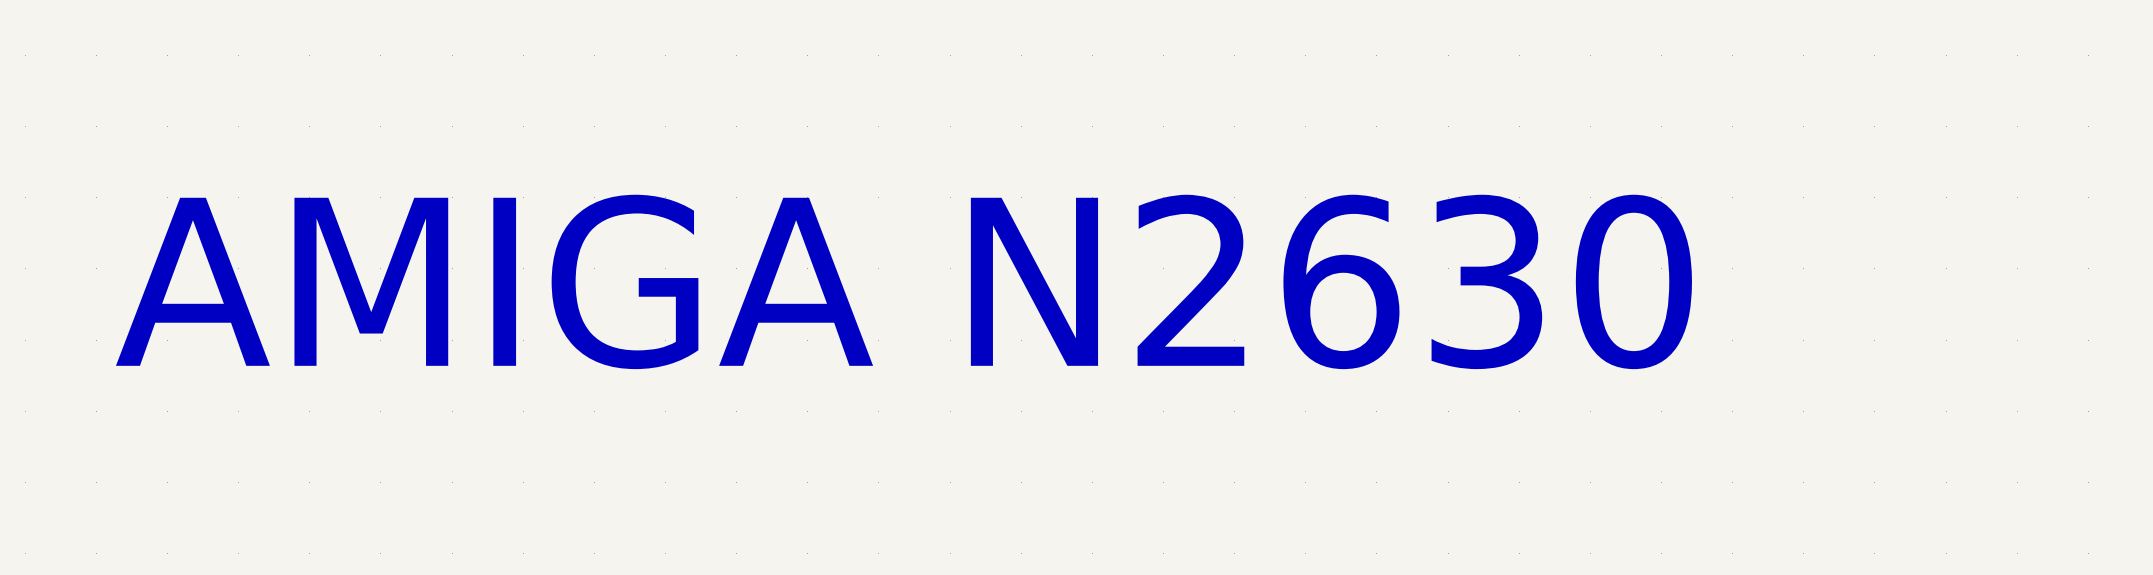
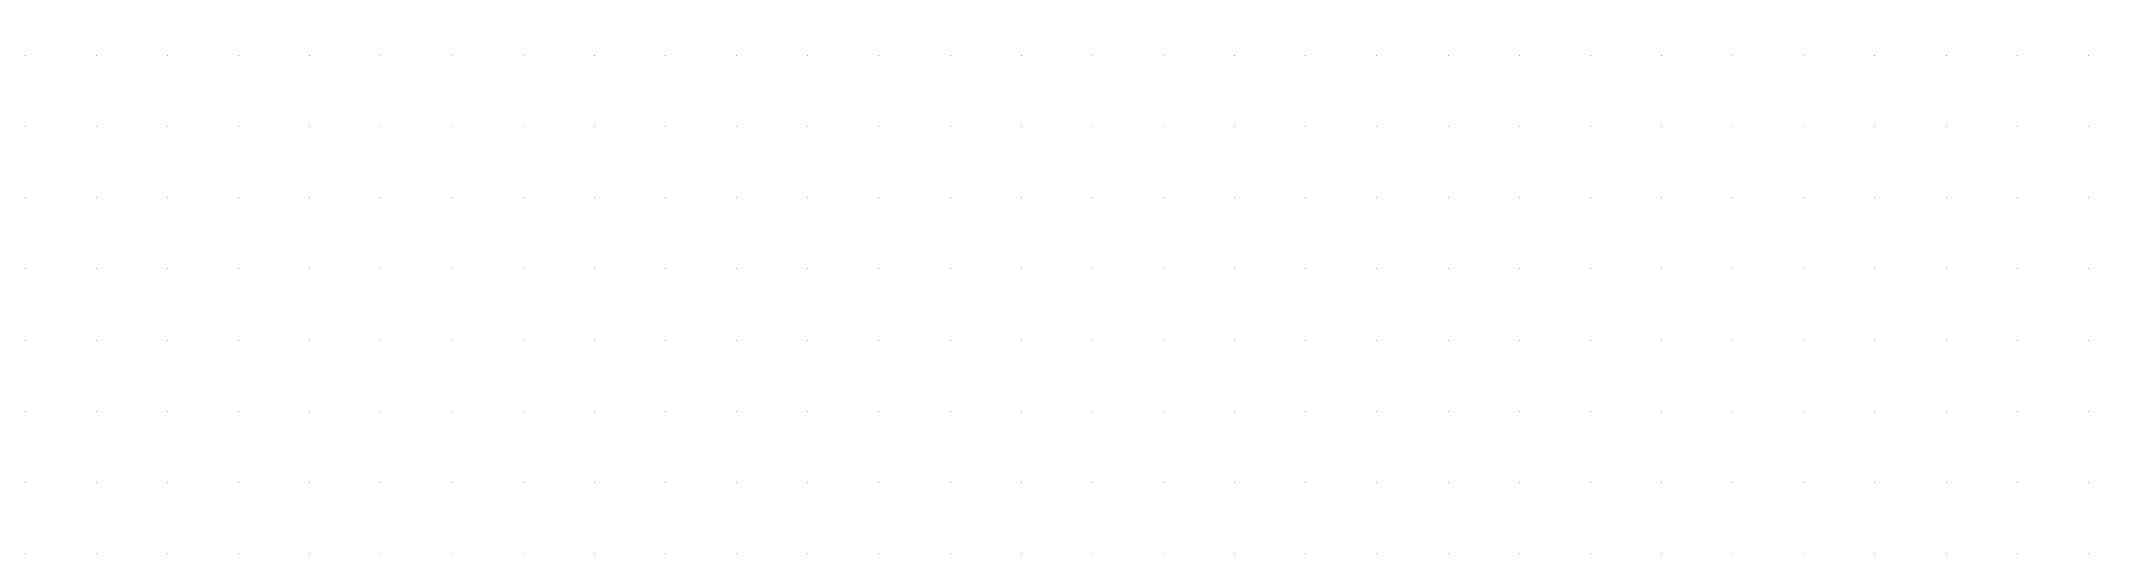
text: AMIGA N2630 (903, 281) -> none

